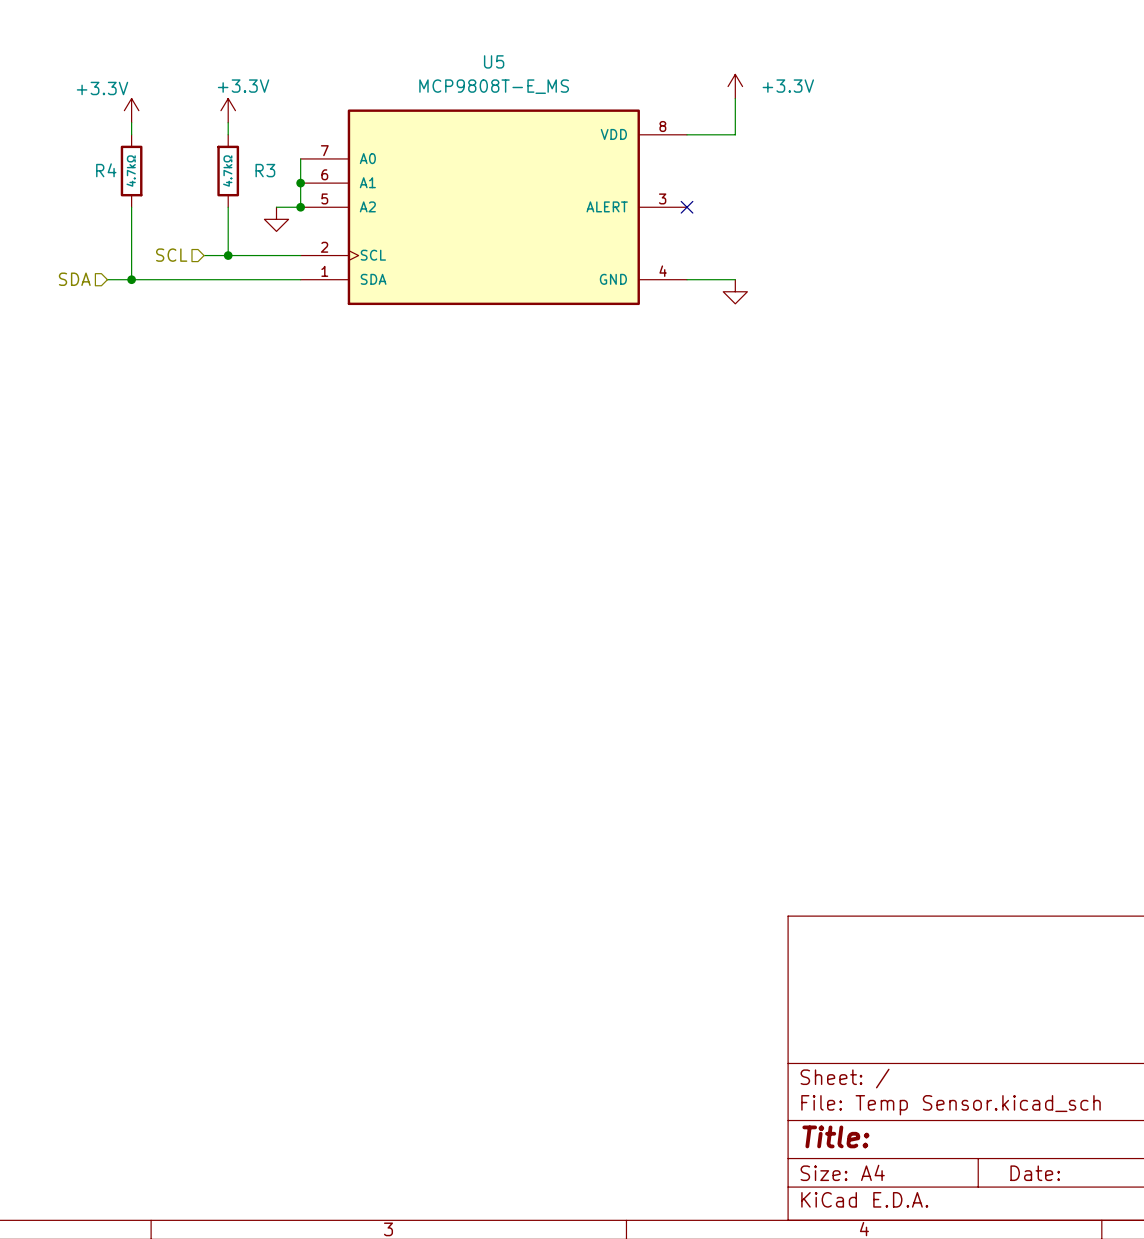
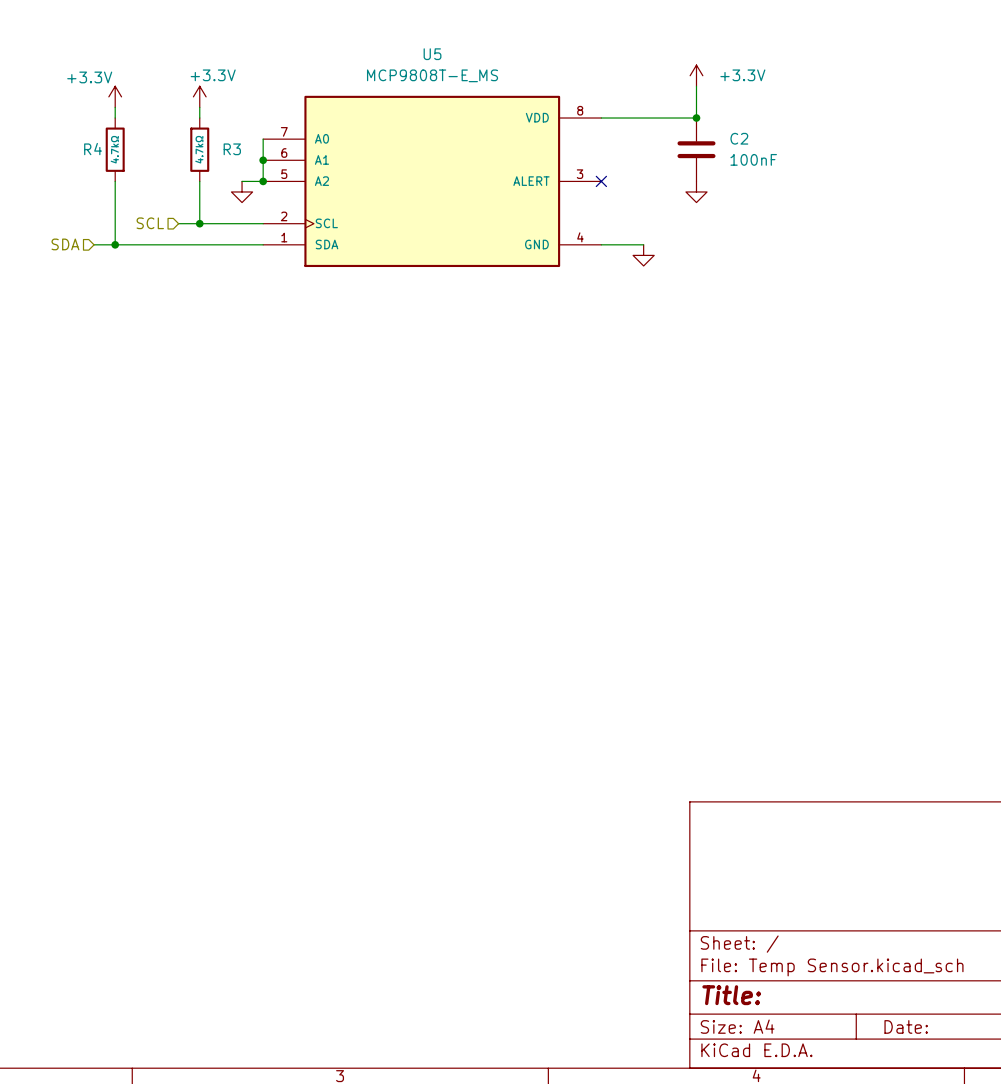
power symbol position: +3.3V (735, 86) -> +3.3V (696, 75)
wire: (735, 98) (735, 134) -> (696, 86) (696, 118) (643, 118)
junction: none -> (696, 118)
C2: none -> 100nF (696, 149)
power symbol: none -> (696, 191)

